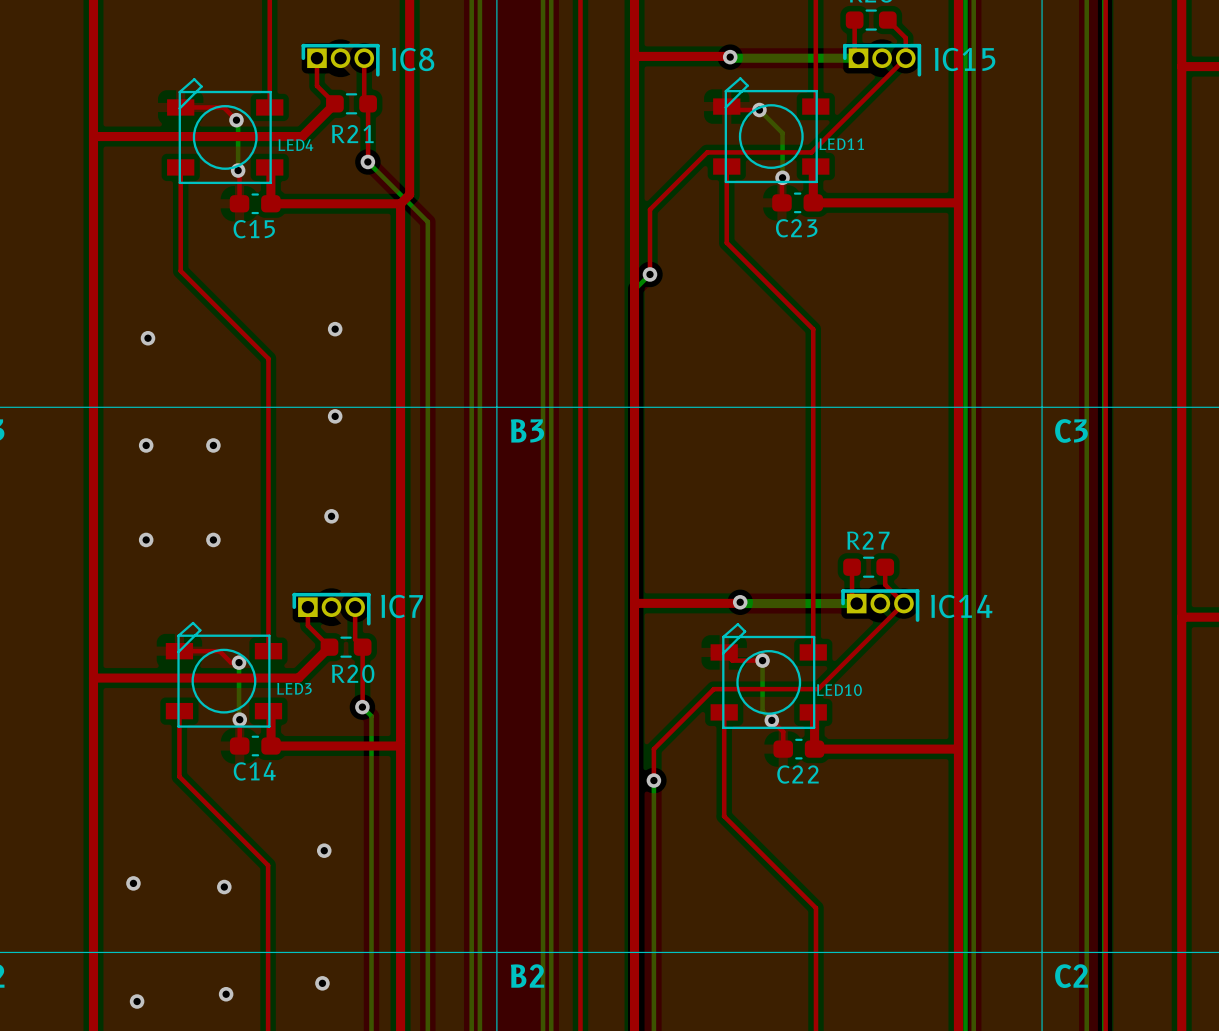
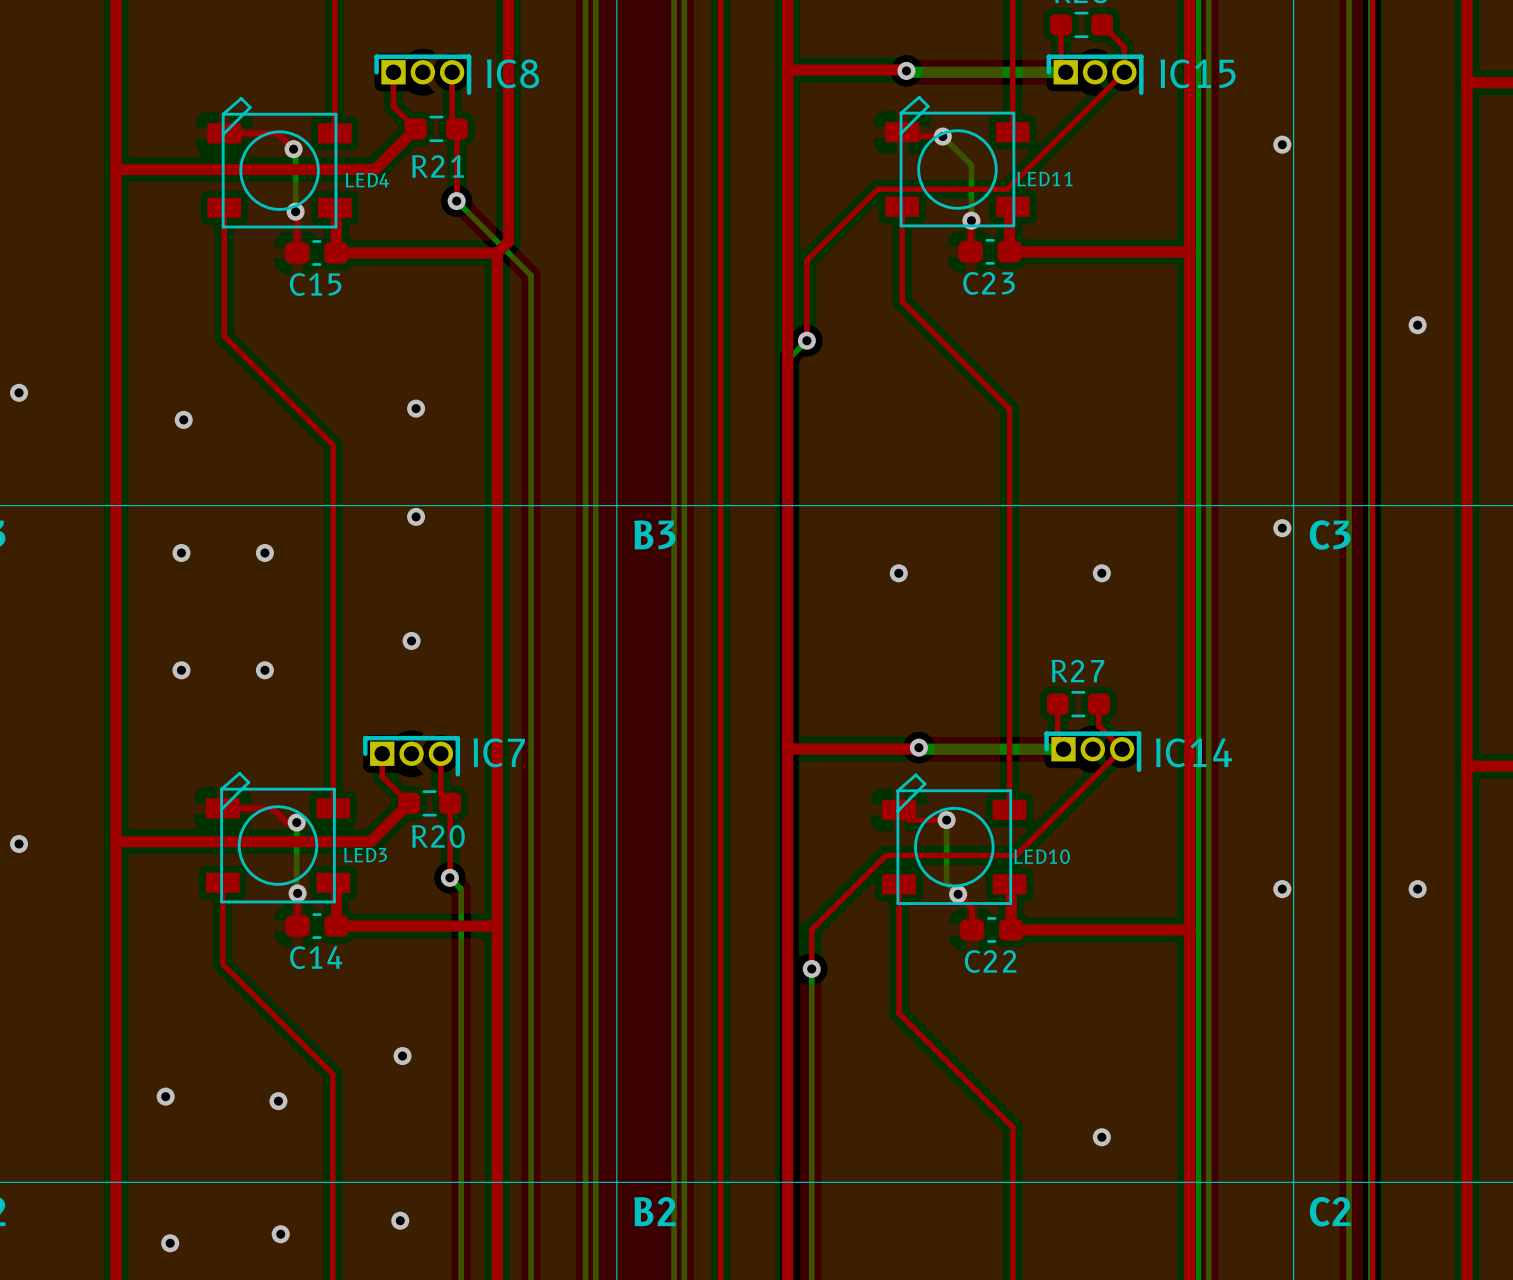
via: none -> (1282, 144)
via: none -> (1417, 325)
via: none -> (19, 392)
via: none -> (1282, 528)
via: none -> (898, 573)
via: none -> (1101, 573)
via: none -> (19, 843)
via: none -> (1282, 889)
via: none -> (1417, 889)
via: none -> (1101, 1137)

